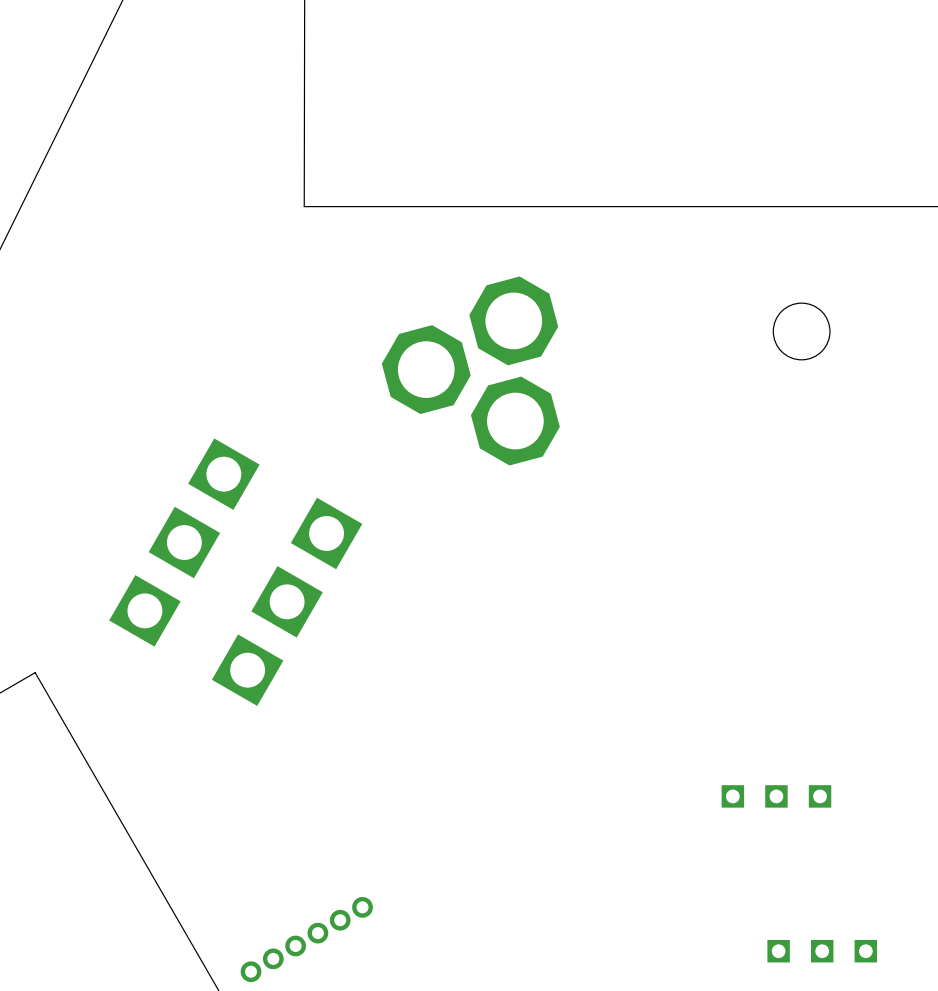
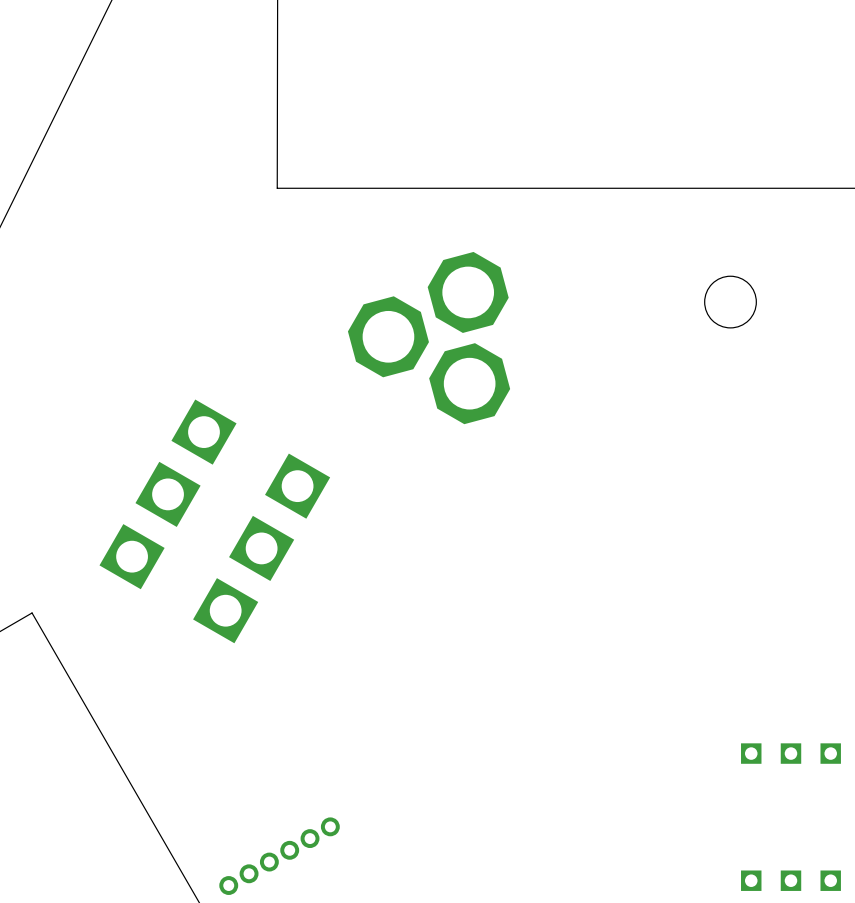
part: (776, 796) -> none
part: none -> (790, 753)
part position: (822, 951) -> (790, 880)

